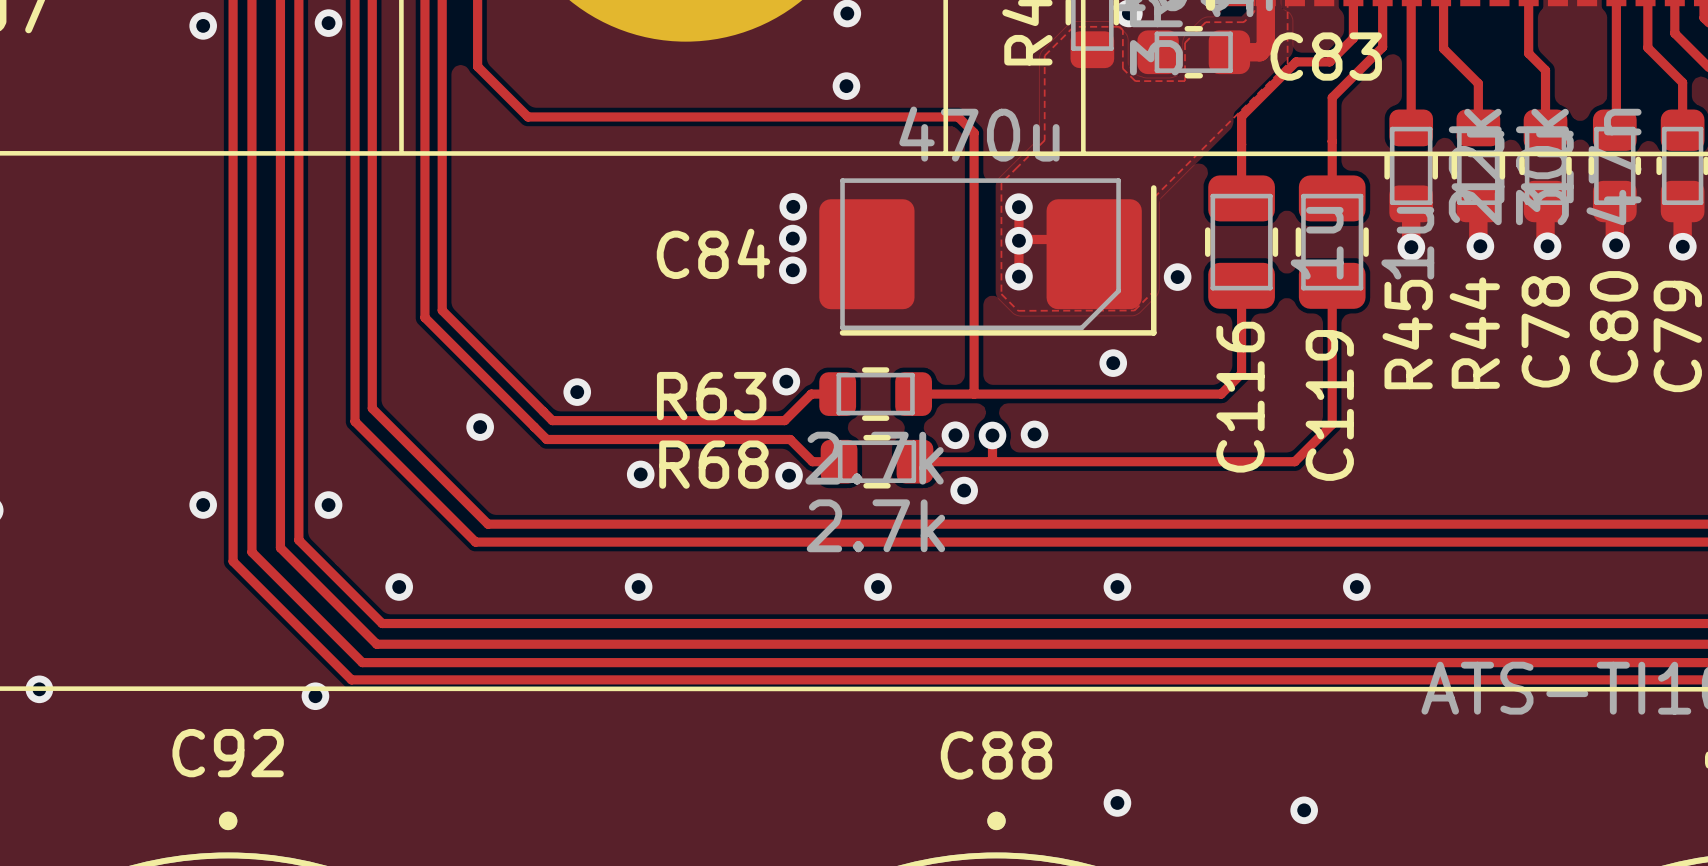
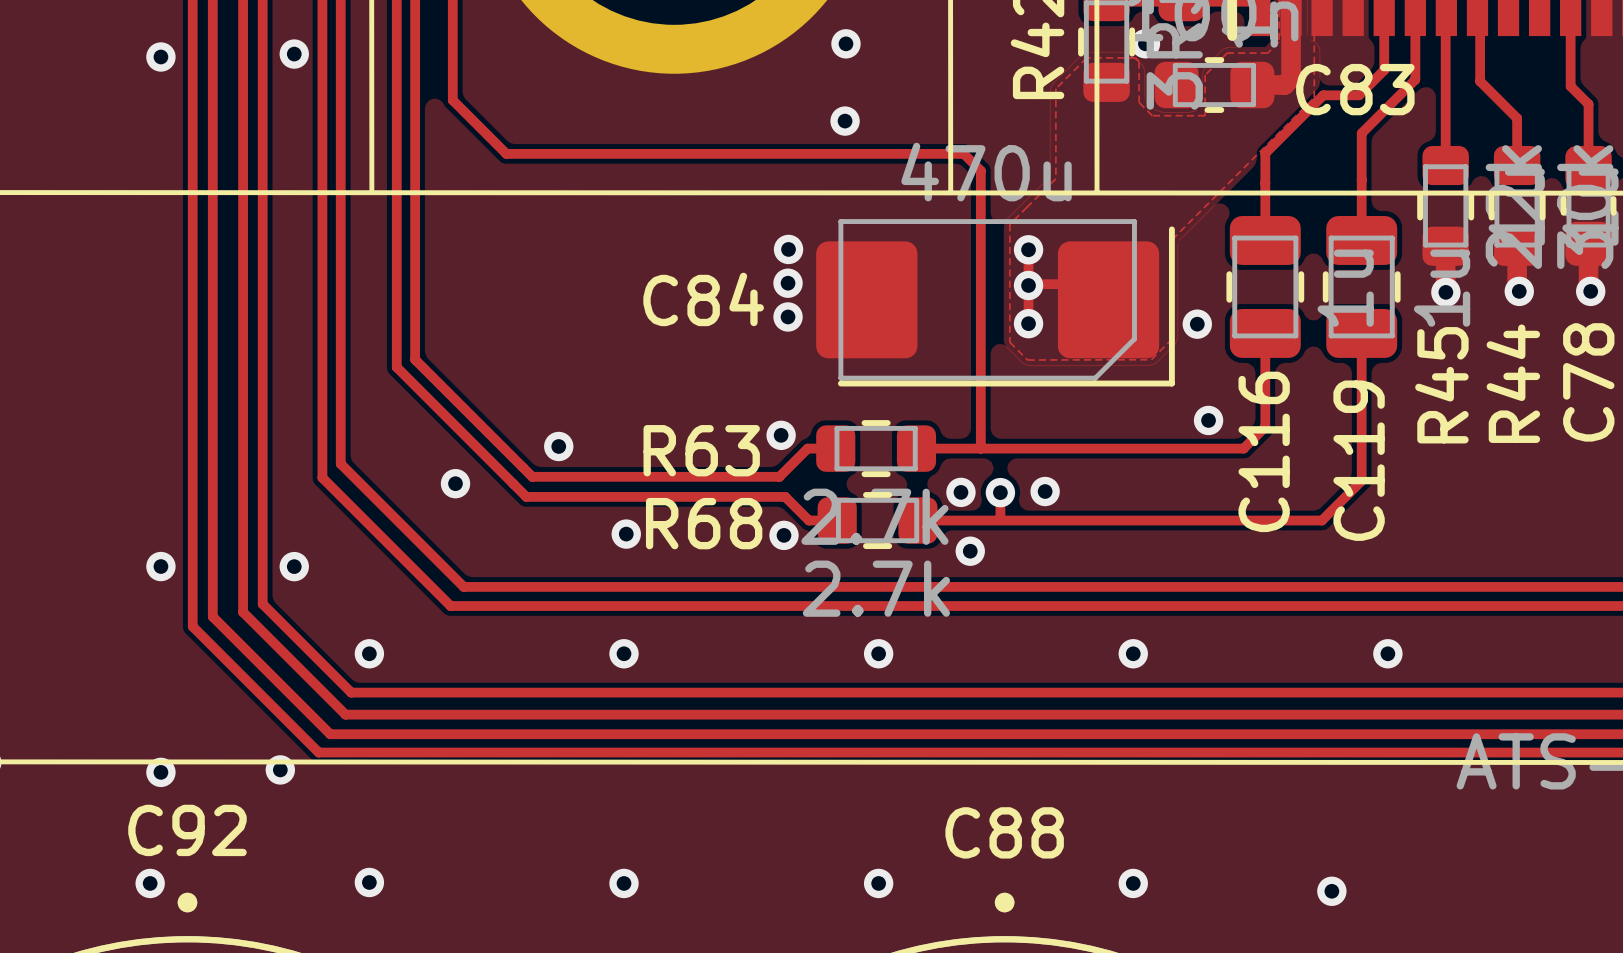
via position: (1113, 363) -> (1208, 420)
via: none -> (160, 772)
via: none -> (150, 883)
via: none -> (369, 882)
via: none -> (624, 883)
via: none -> (878, 883)

